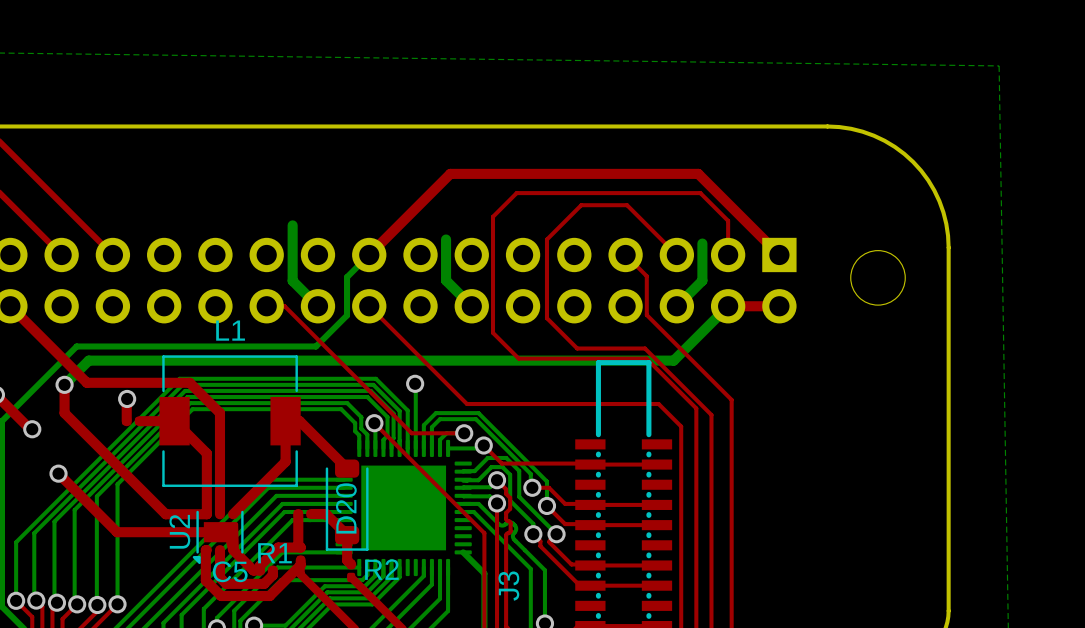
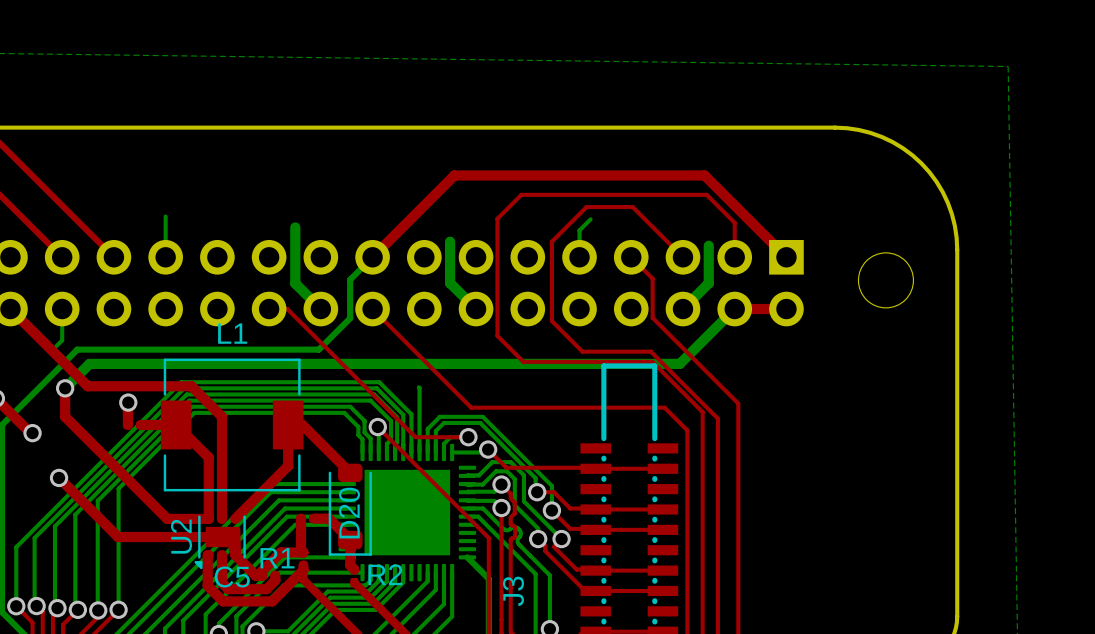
bottom track: none -> (165, 216) (165, 257)
bottom track: none -> (590, 219) (579, 230) (579, 257)
bottom track: none -> (62, 309) (62, 340) (55, 346)
via: (415, 383) -> none

